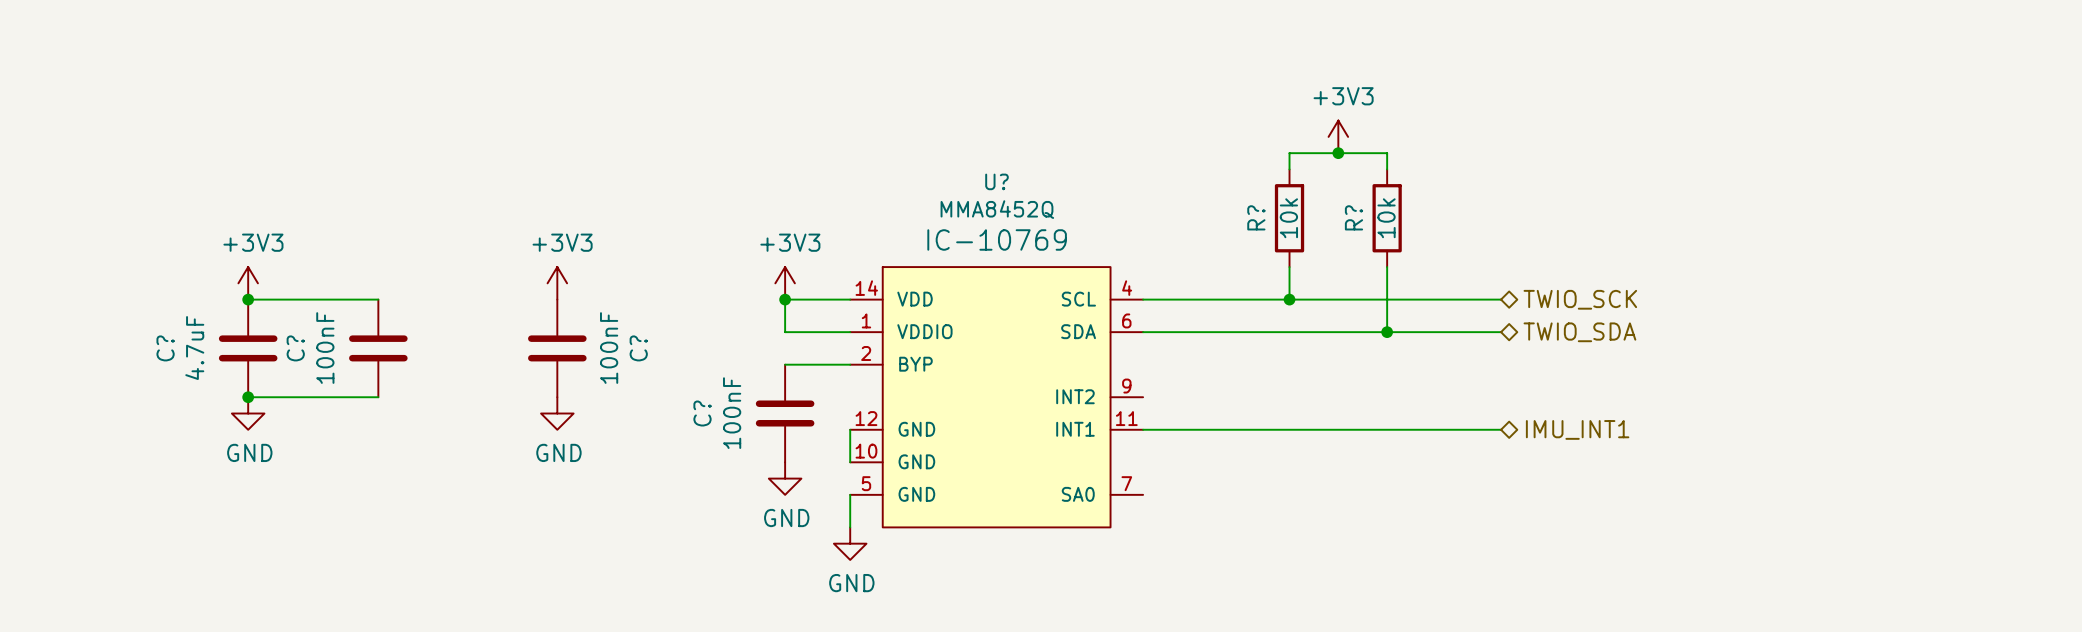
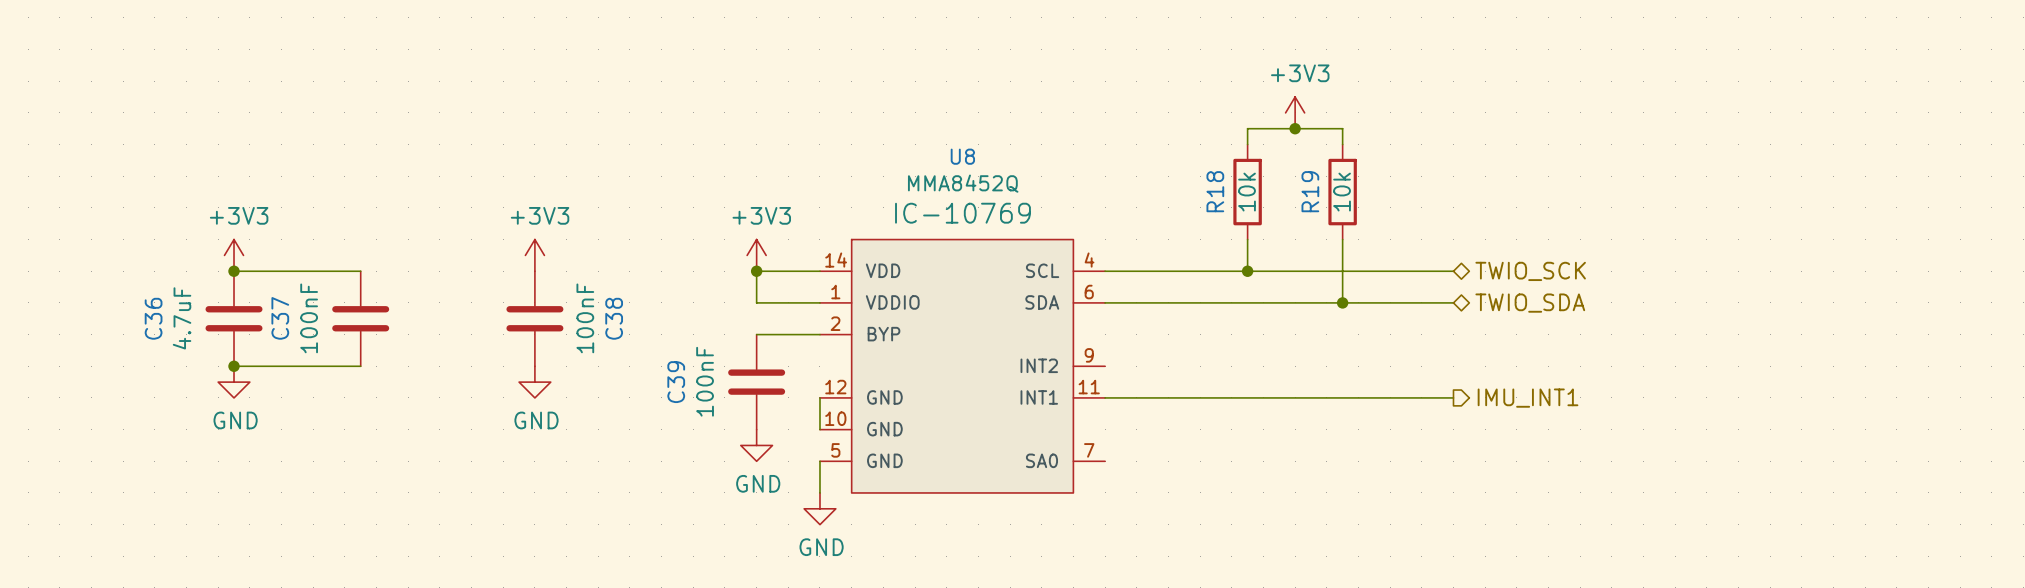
U? name: U? (996, 181) -> U8 (962, 156)
R? name: R? (1256, 217) -> R18 (1215, 191)
R? name: R? (1353, 217) -> R19 (1310, 191)
C? name: C? (165, 348) -> C36 (153, 318)
C? name: C? (295, 348) -> C37 (280, 318)
C? name: C? (638, 348) -> C38 (614, 318)
C? name: C? (702, 413) -> C39 (676, 382)
hierarchical label shape: bidirectional (1577, 429) -> output (1528, 398)

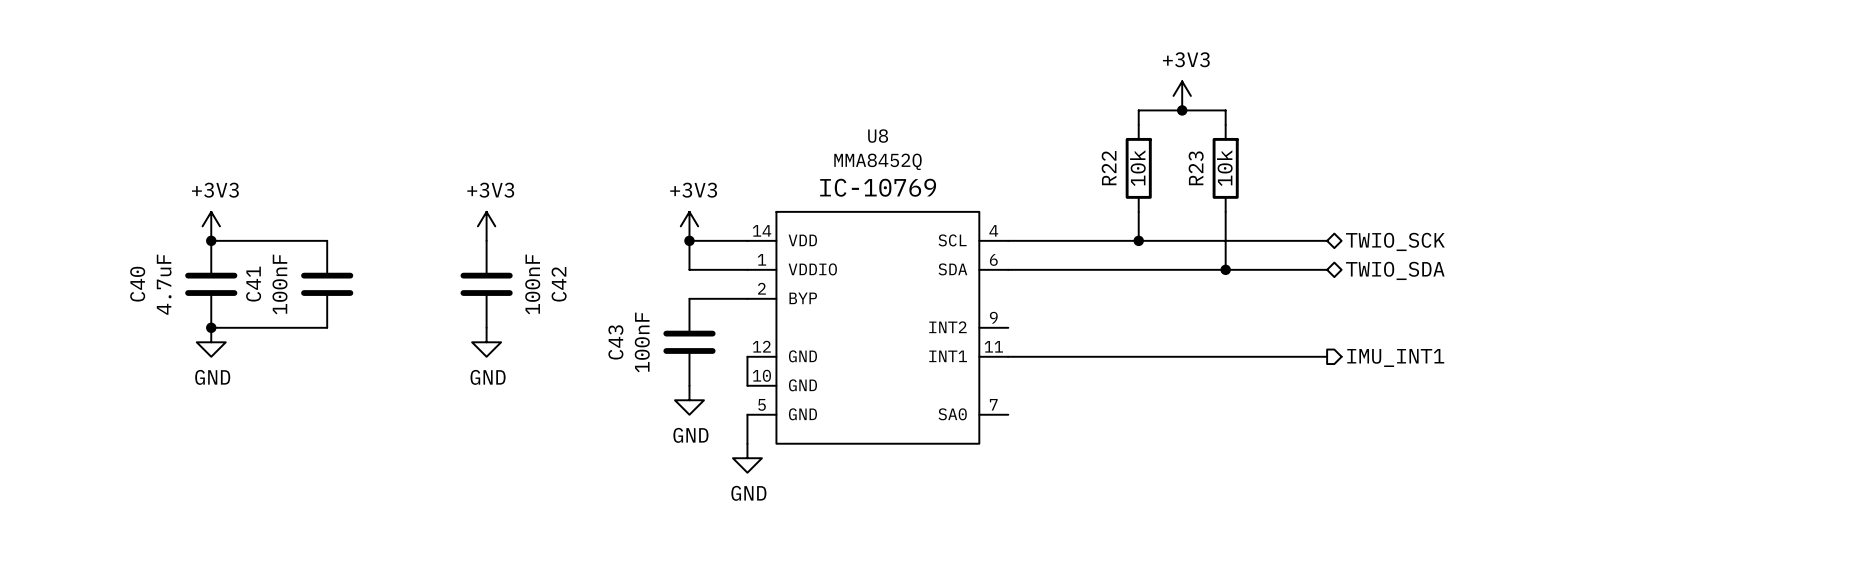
R18 name: R18 (1215, 191) -> R22 (1109, 168)
R19 name: R19 (1310, 191) -> R23 (1196, 168)
C36 name: C36 (153, 318) -> C40 (137, 284)
C37 name: C37 (280, 318) -> C41 (253, 284)
C38 name: C38 (614, 318) -> C42 (559, 284)
C39 name: C39 (676, 382) -> C43 (615, 342)

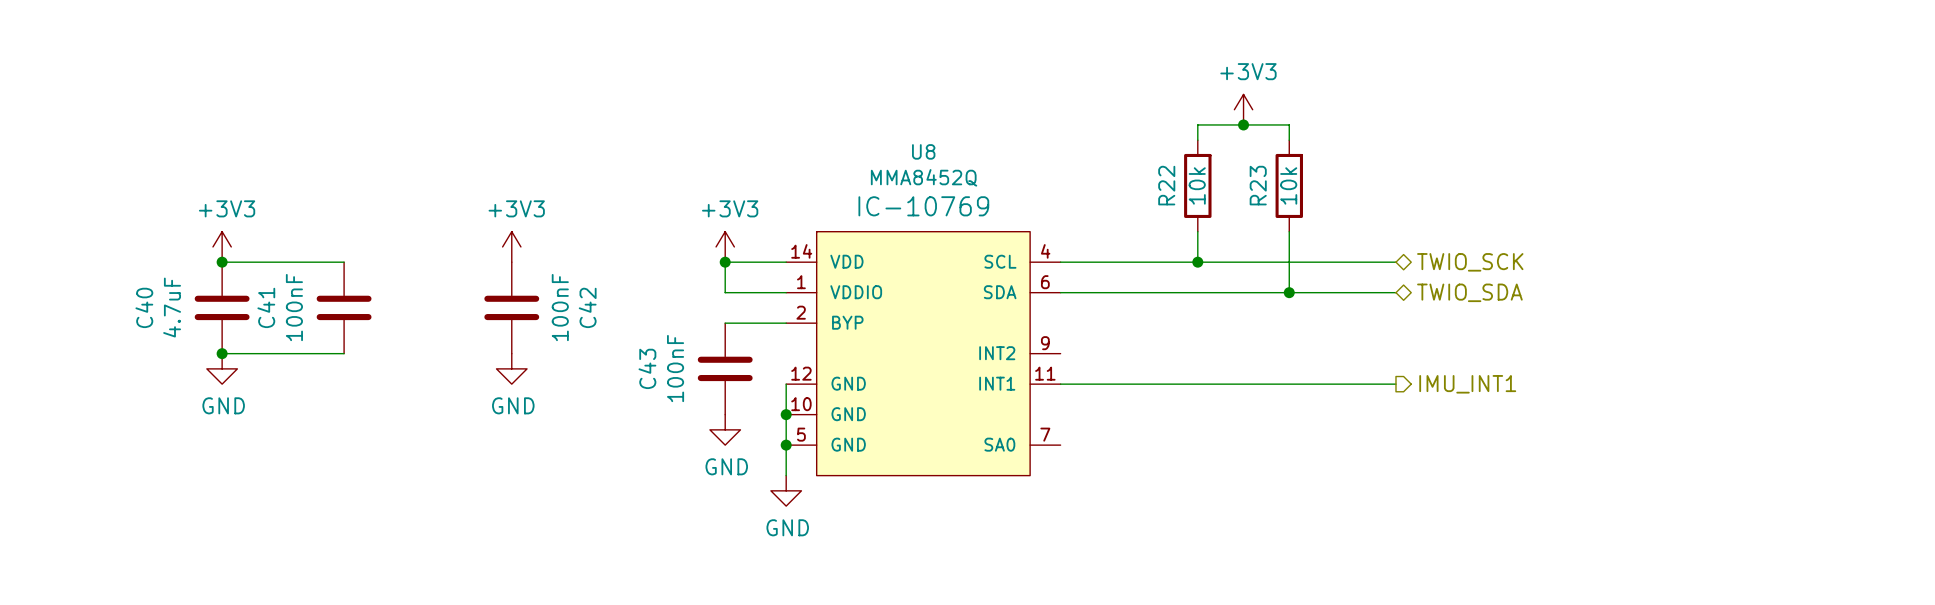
wire: none -> (786, 414) (786, 445)
junction: none -> (786, 414)
junction: none -> (786, 445)

